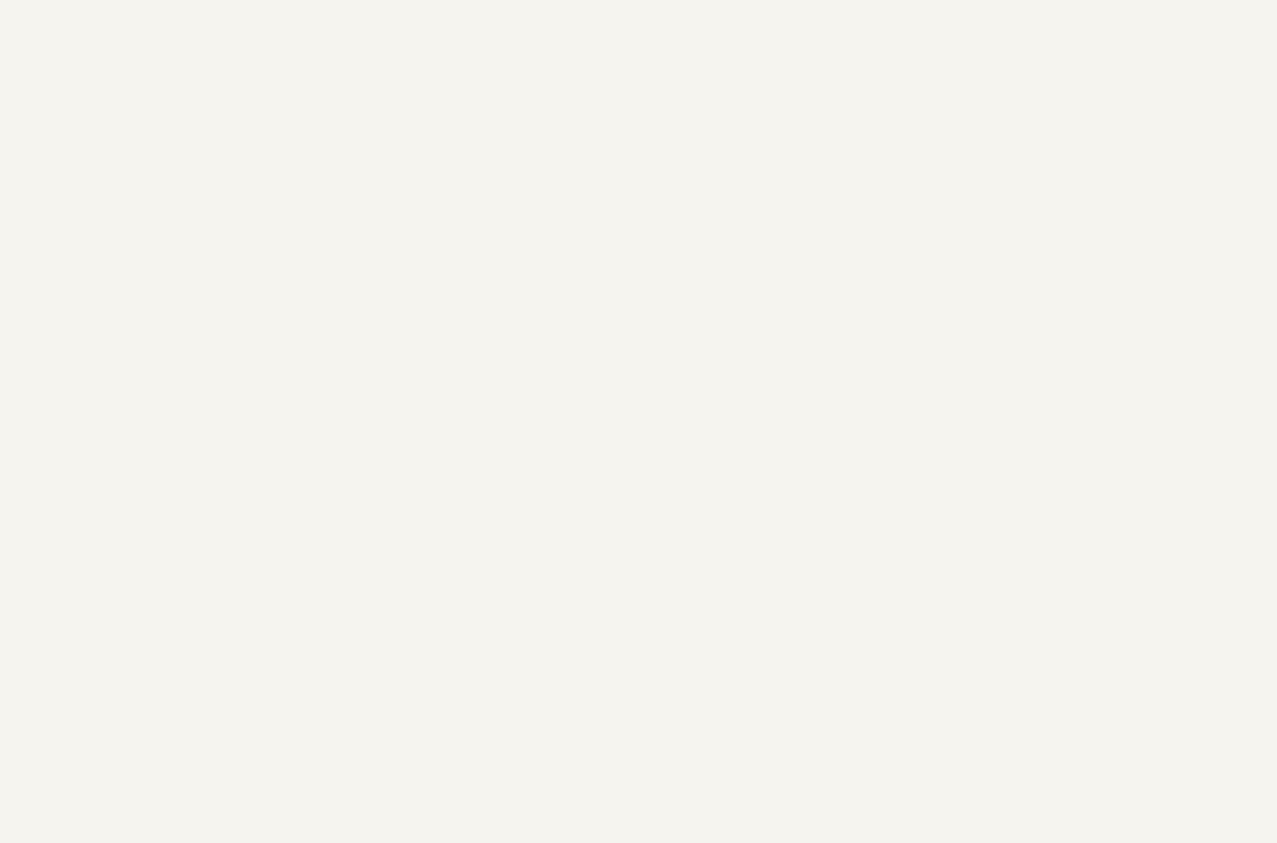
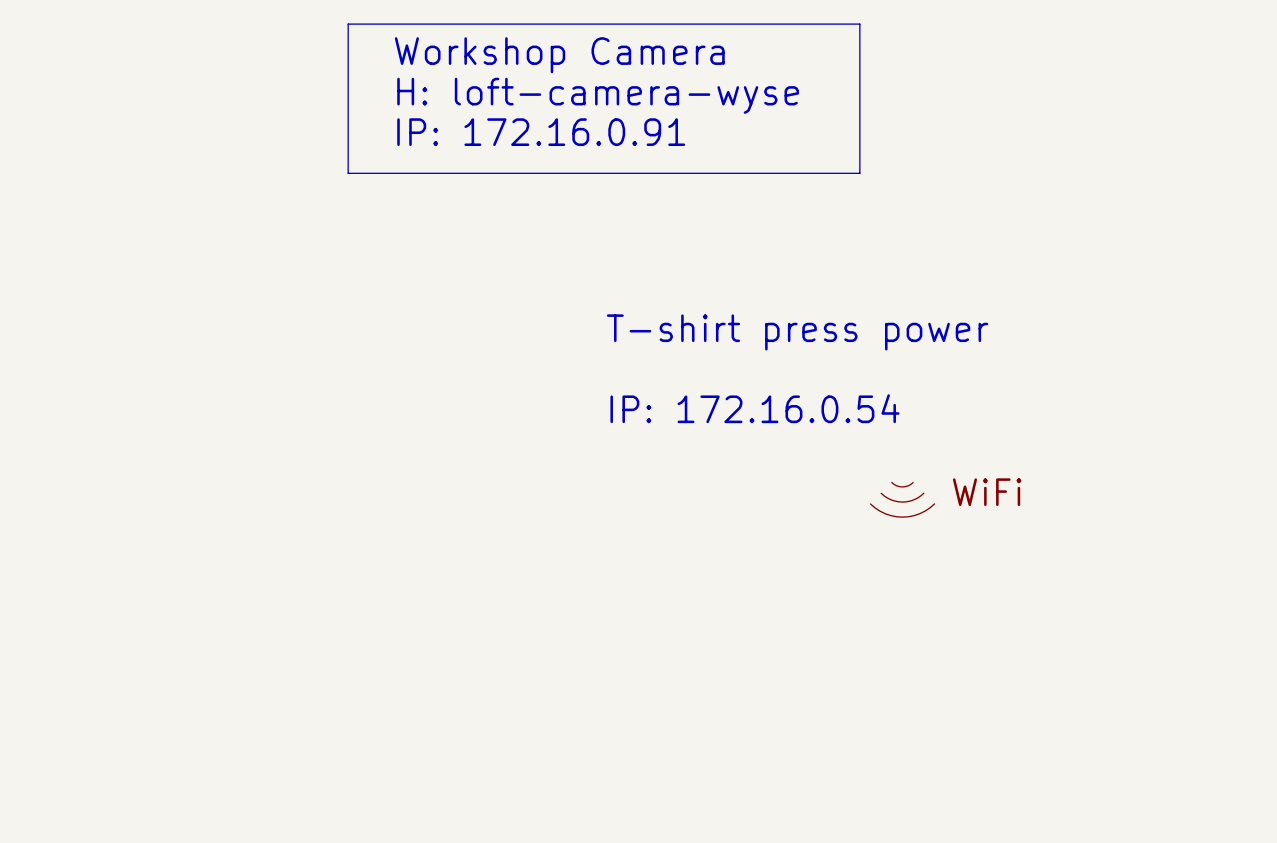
line: none -> (348, 24) (348, 173) (859, 173) (859, 24) (348, 24)
text: none -> Workshop Camera (559, 55)
text: none -> H: loft-camera-wyse (598, 95)
text: none -> IP: 172.16.0.91 (541, 132)
text: none -> T-shirt press power (797, 332)
text: none -> IP: 172.16.0.54 (754, 408)
part: none -> (902, 499)

